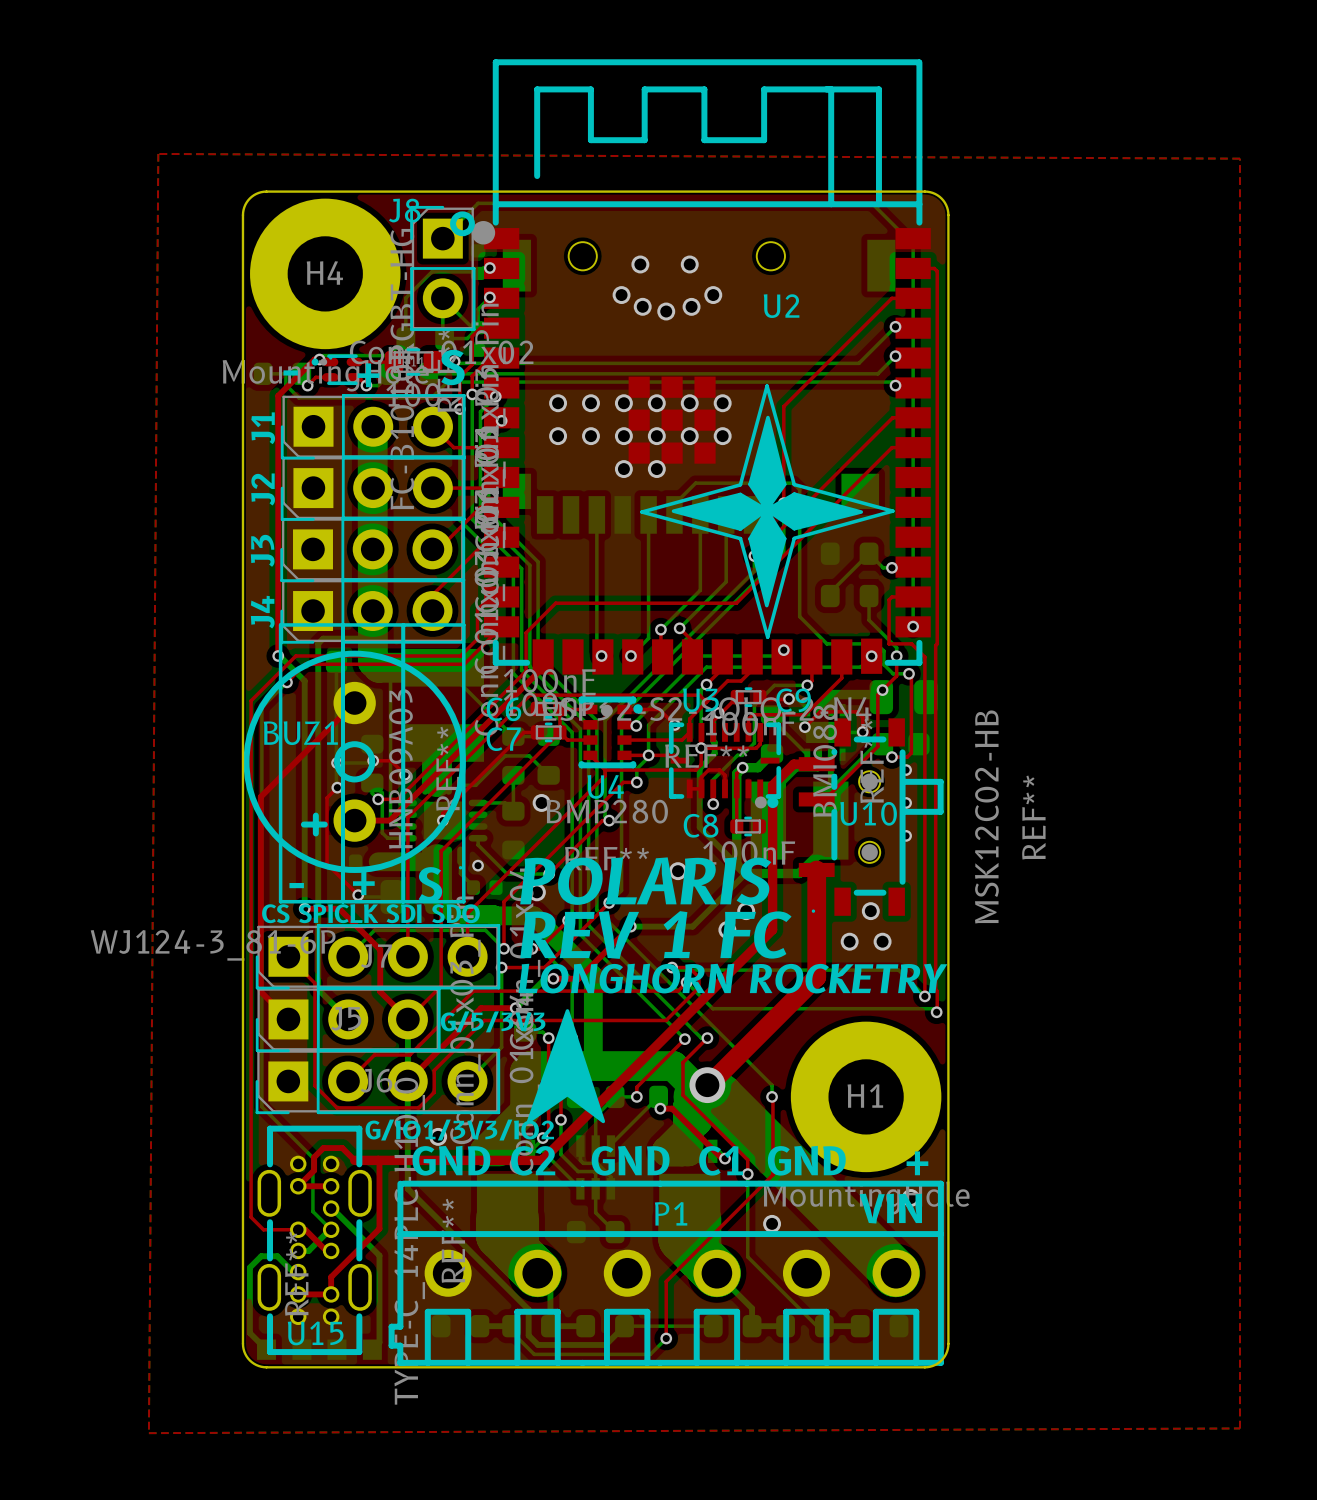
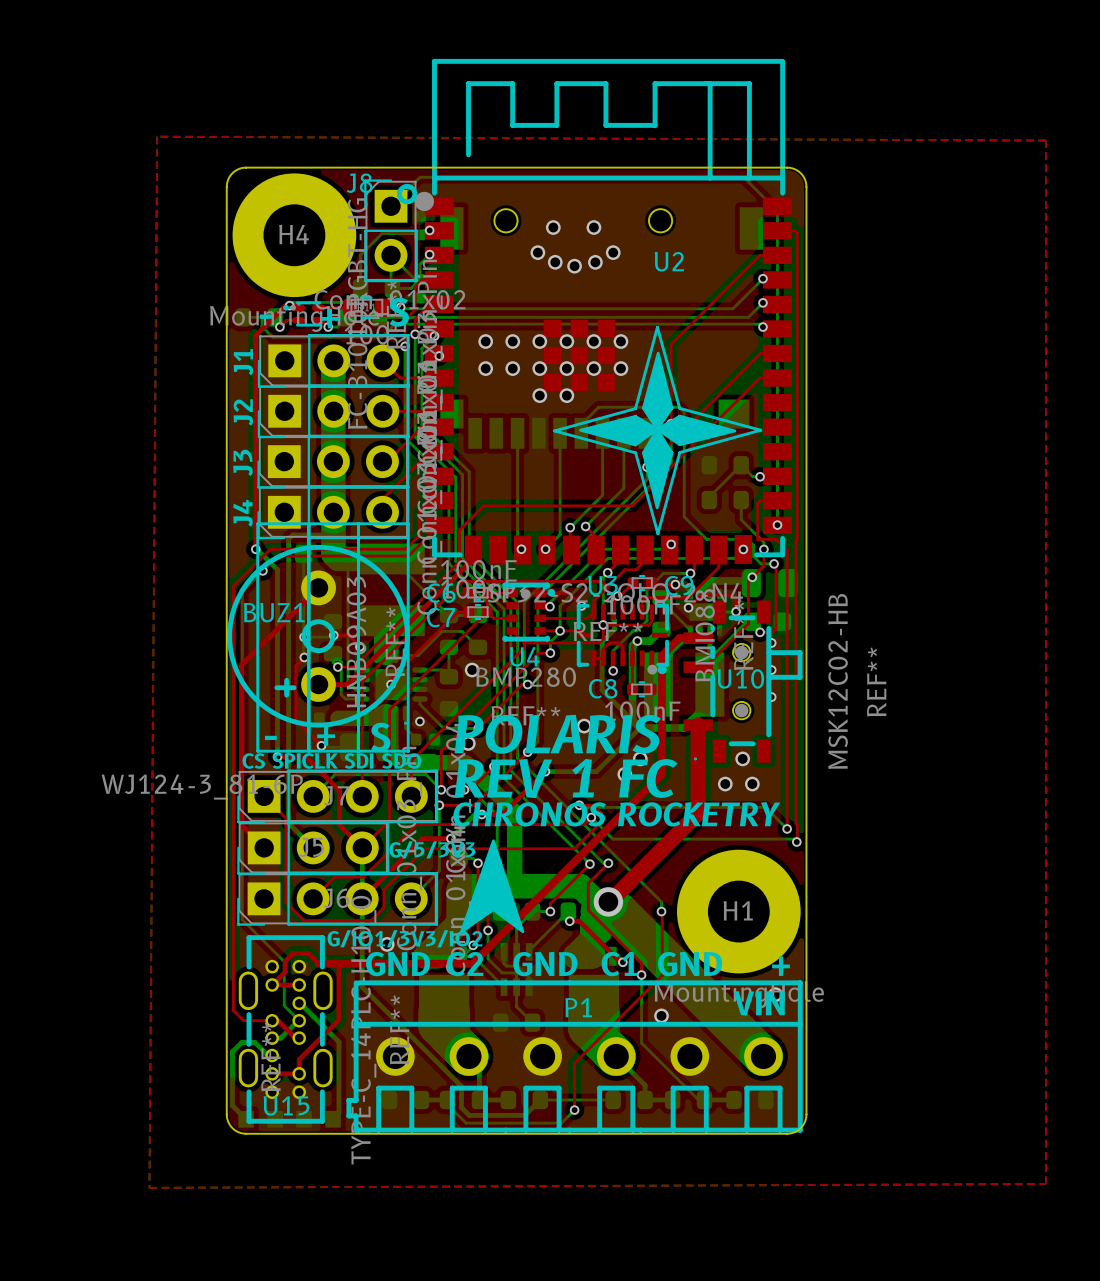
text: LONGHORN ROCKETRY (732, 978) -> CHRONOS ROCKETRY (616, 814)

